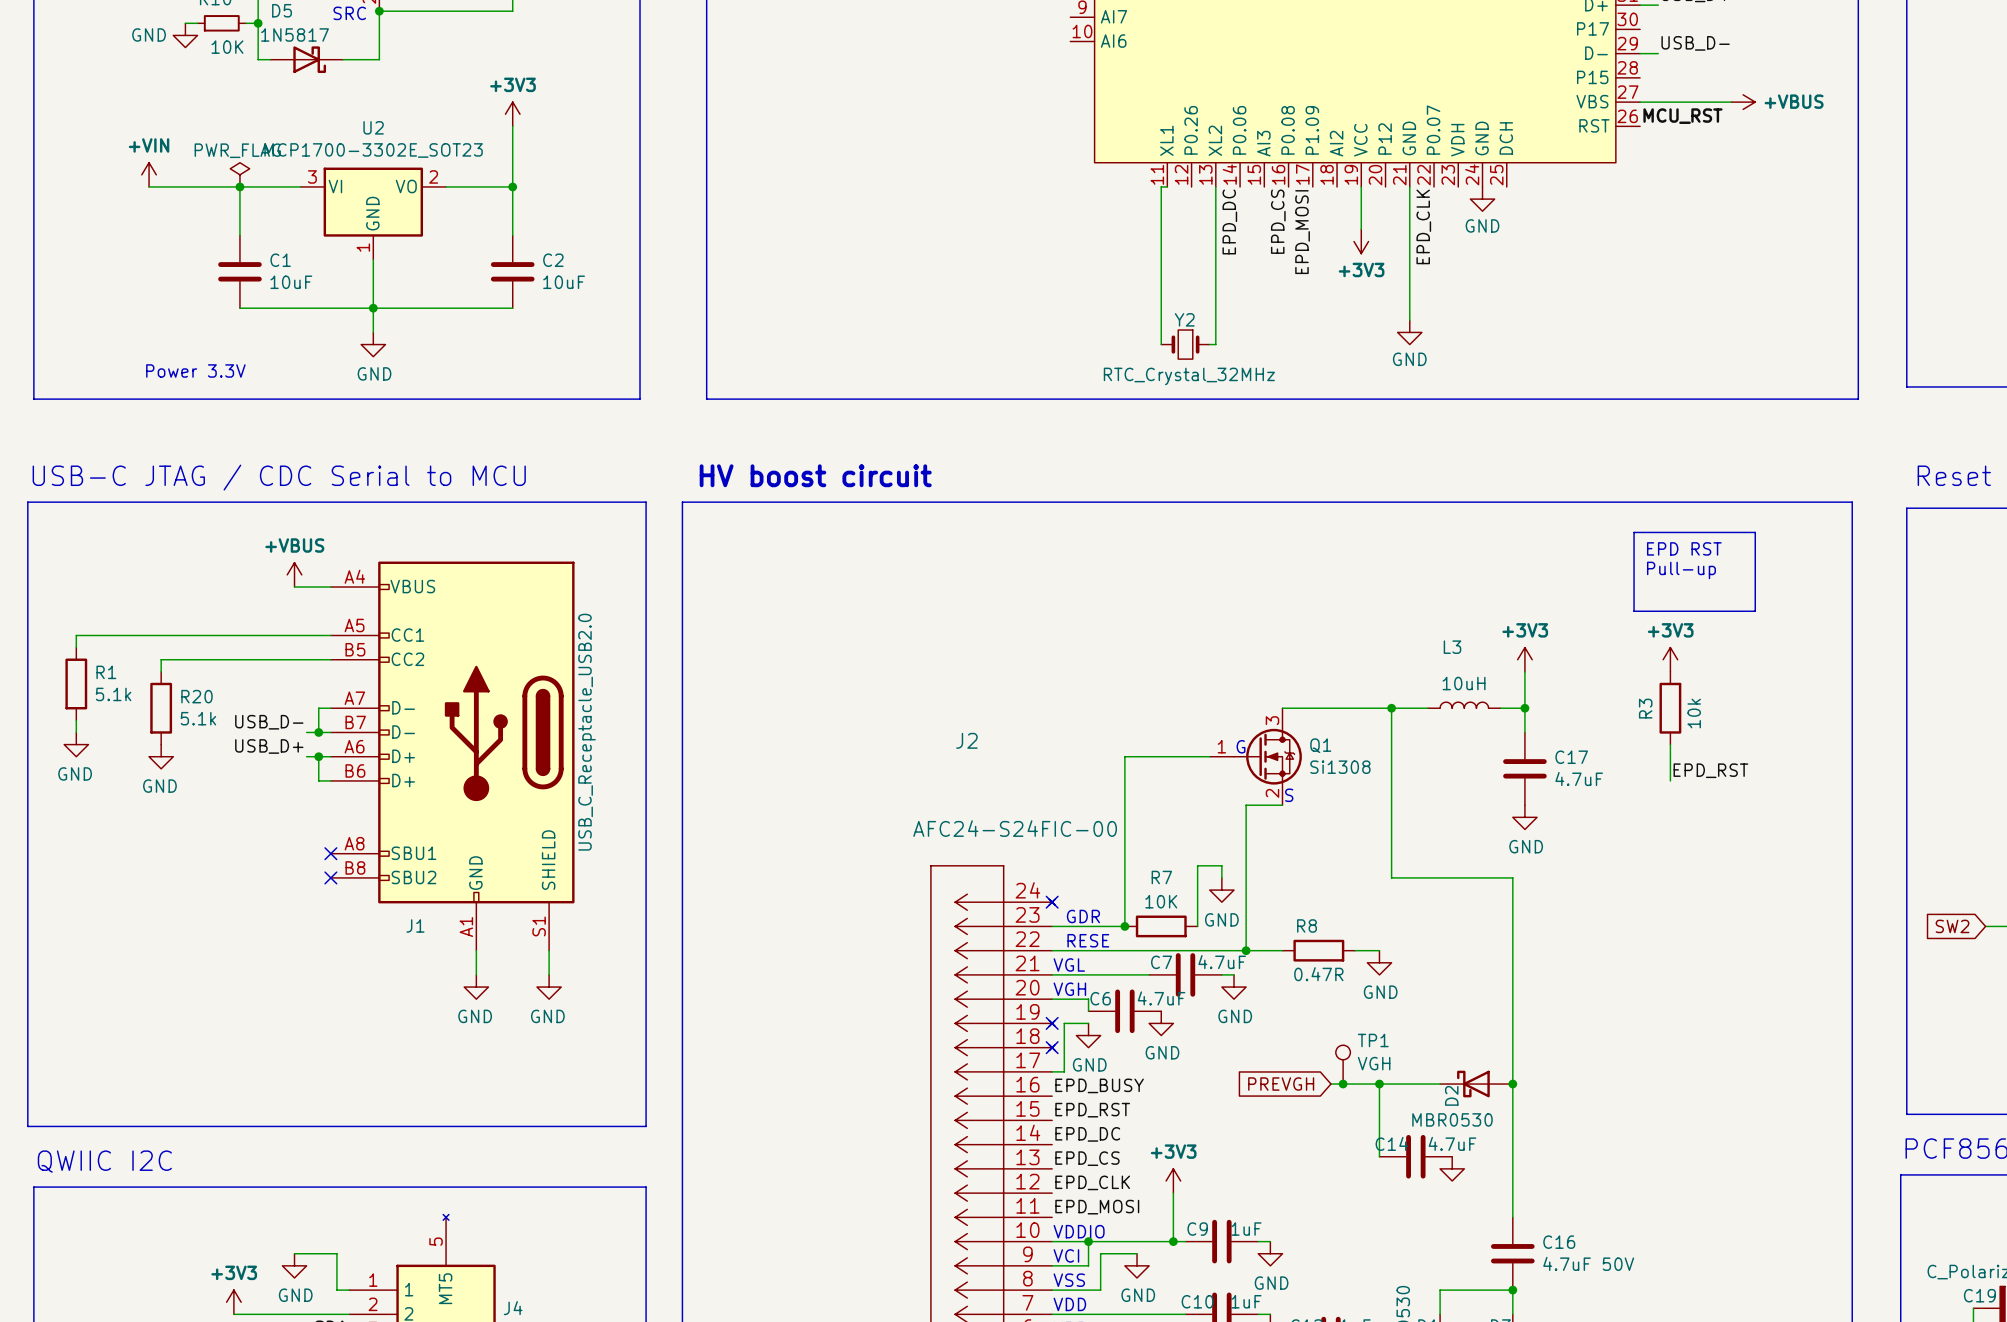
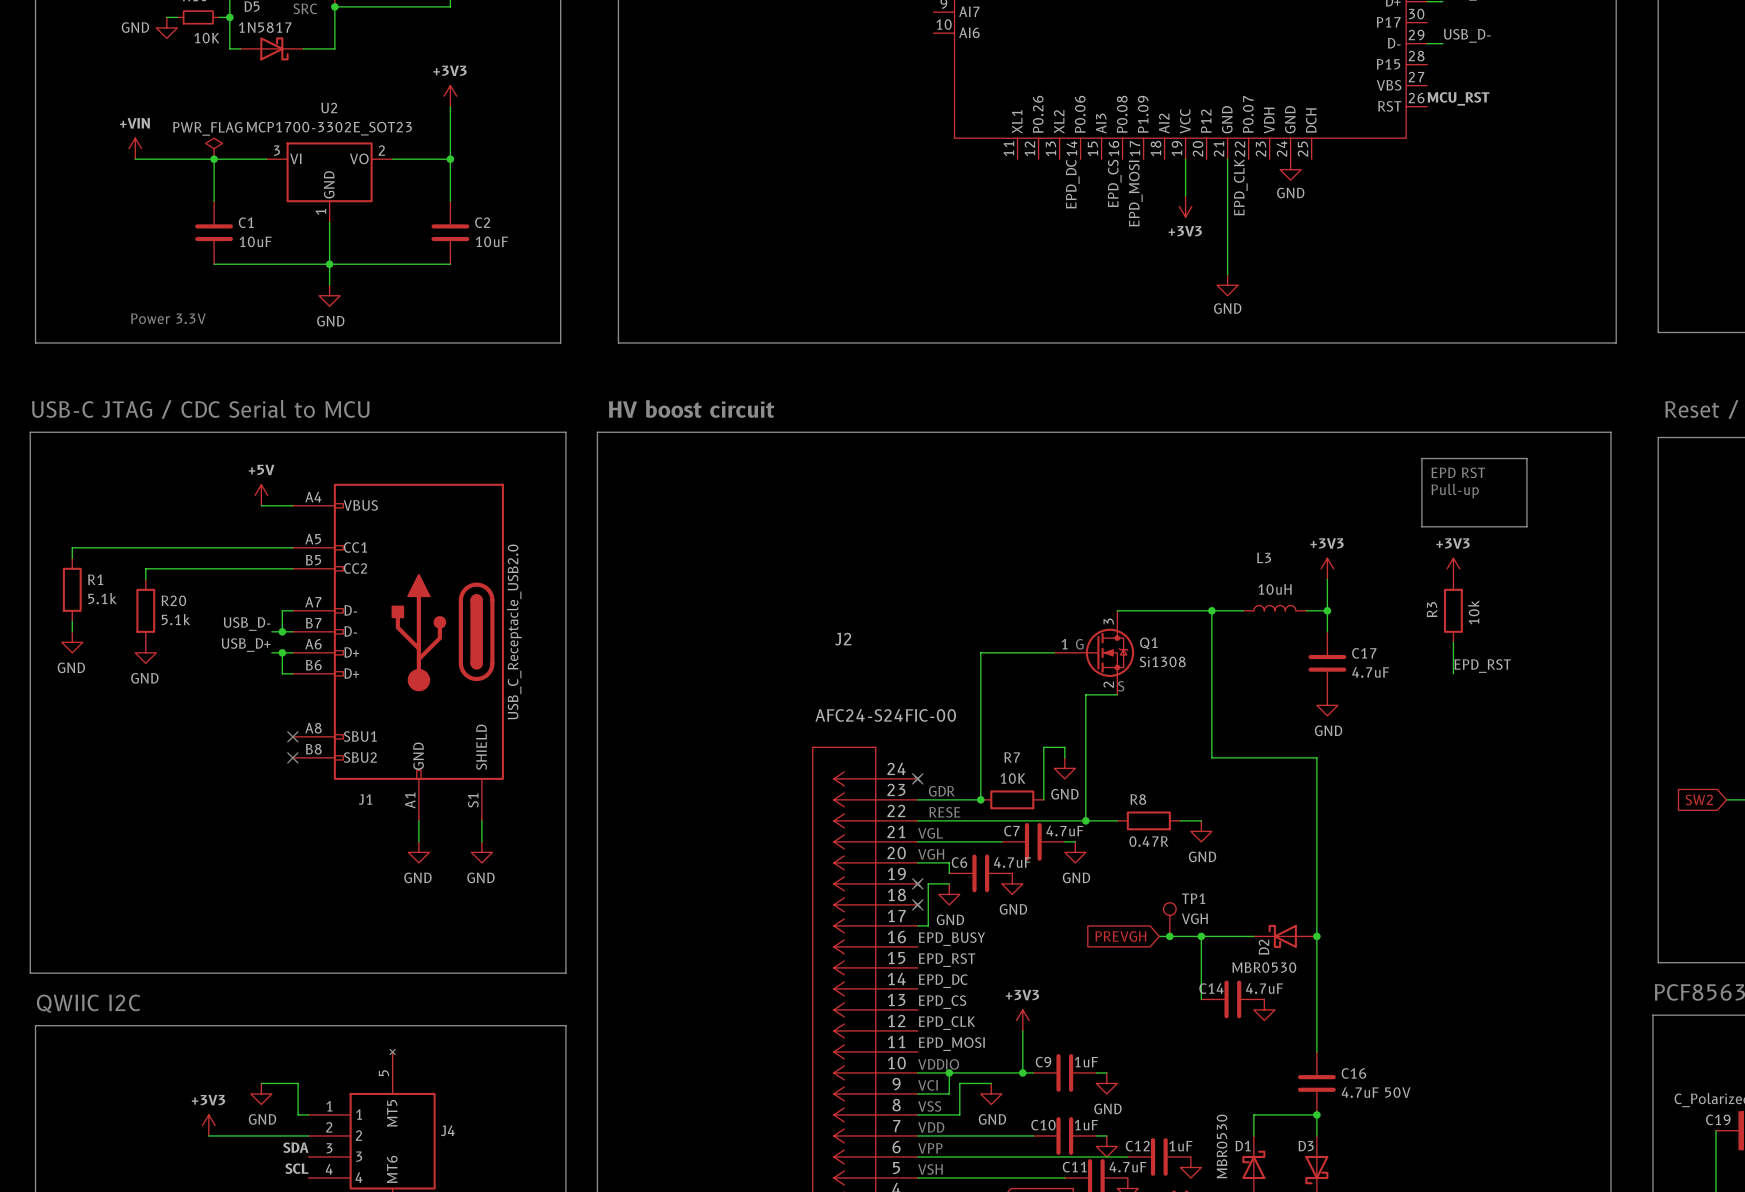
wire: (1640, 102) (1731, 102) -> none
power symbol: +VBUS (1743, 102) -> none
wire: (1167, 186) (1161, 186) (1161, 344) -> none
wire: (1215, 186) (1215, 344) (1209, 344) -> none
Y2: RTC_Crystal_32MHz (1185, 344) -> none
power symbol: +VBUS (294, 574) -> +5V (261, 495)

